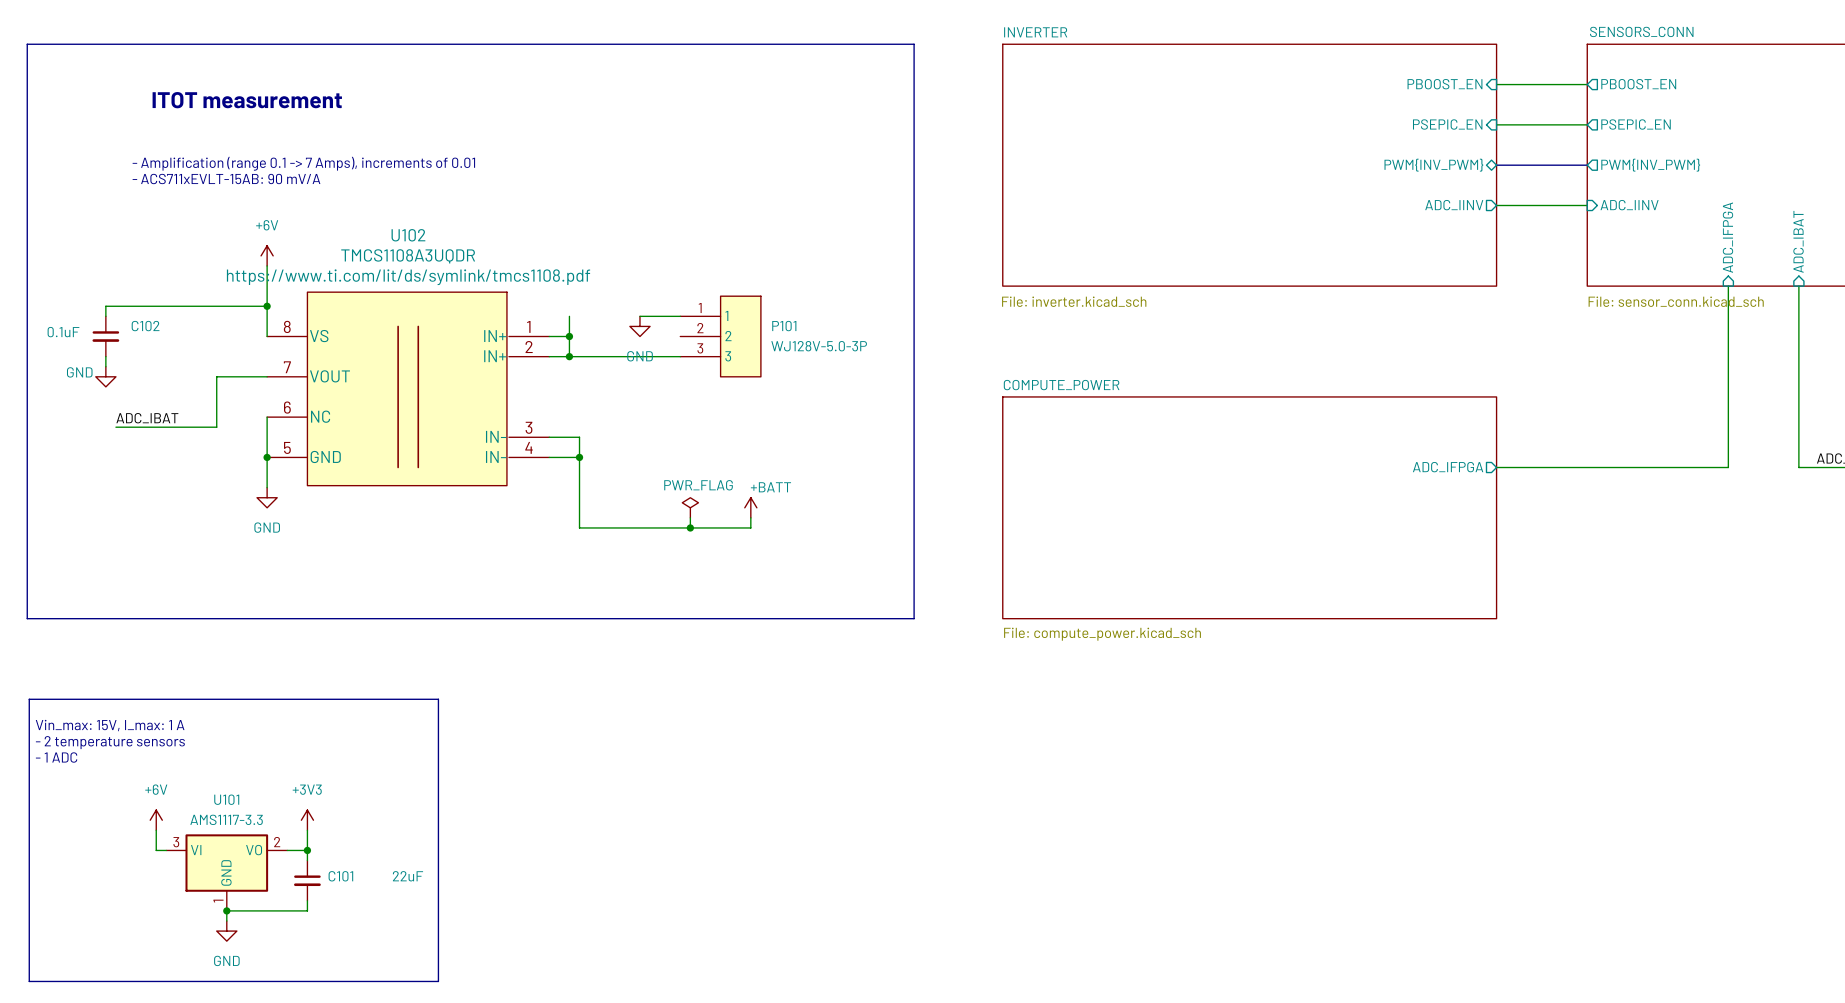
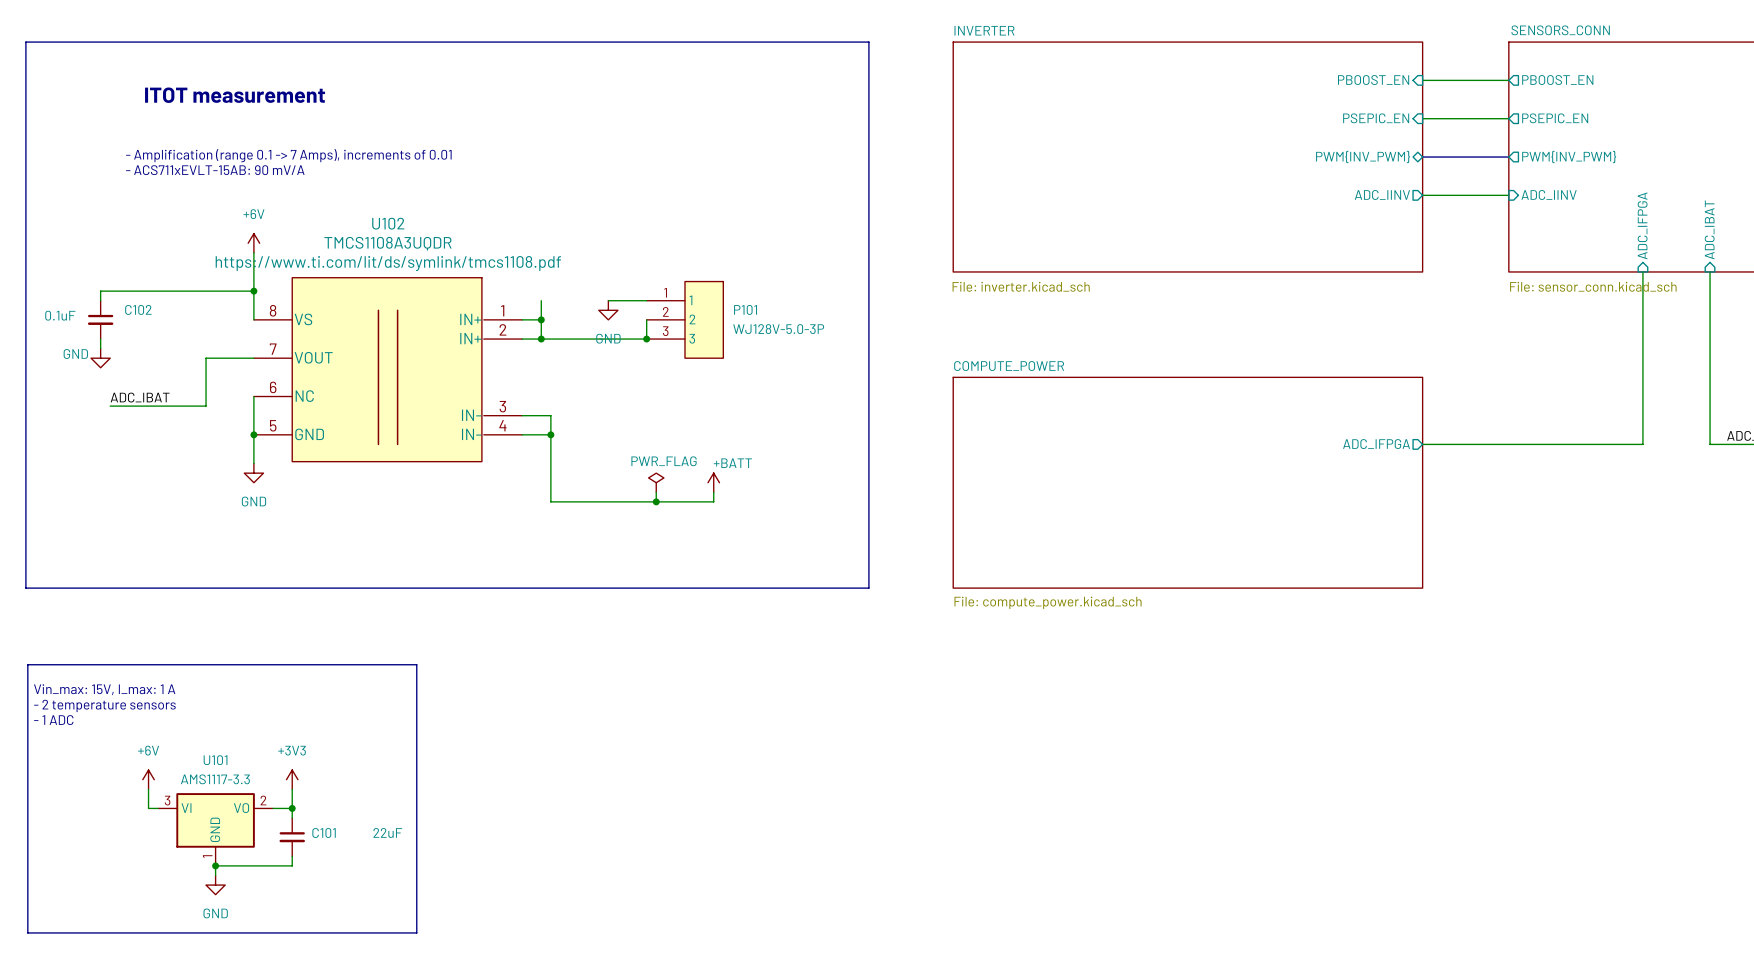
wire: none -> (646, 319) (646, 339)
junction: none -> (646, 339)

